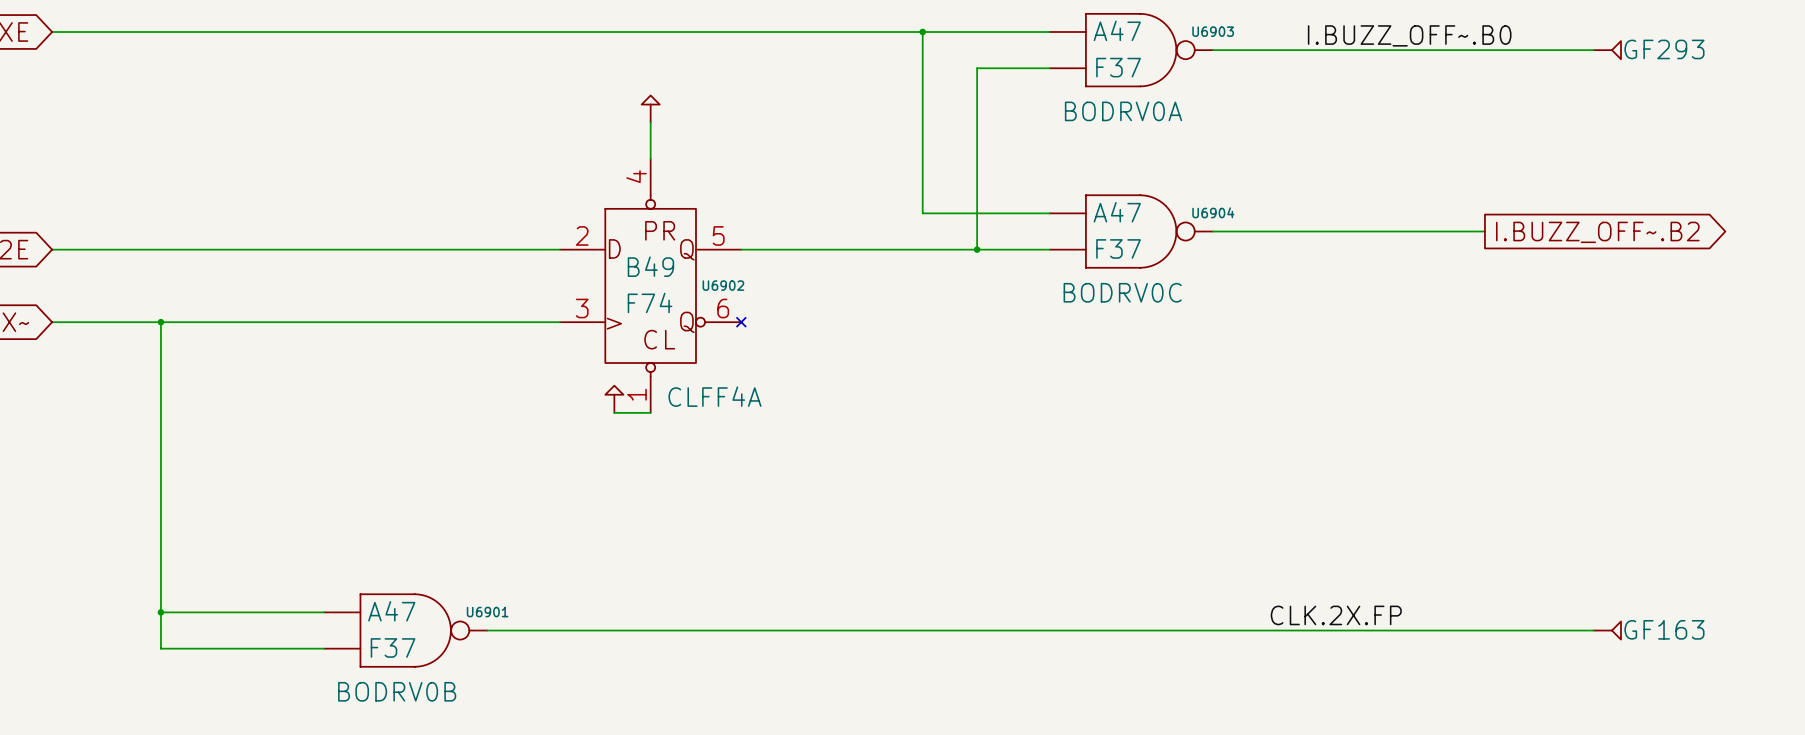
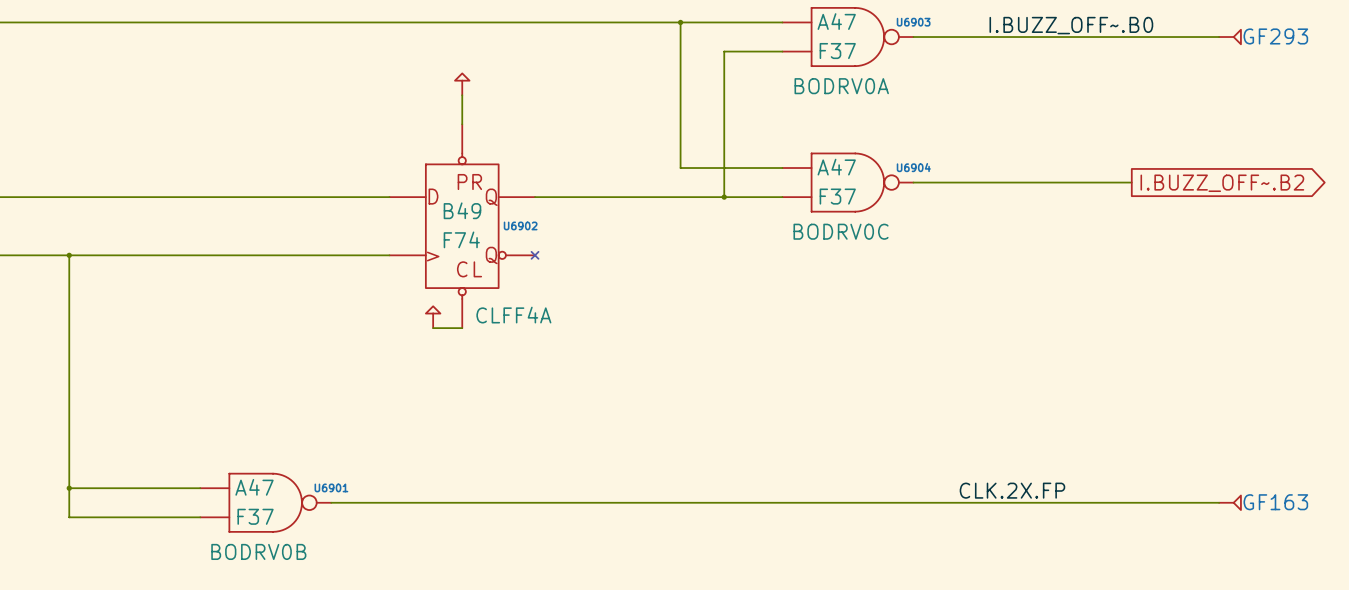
U6902 pin number: 4 (636, 176) -> none
U6902 pin number: 2 (582, 235) -> none
U6902 pin number: 5 (718, 235) -> none
U6902 pin number: 3 (582, 308) -> none
U6902 pin number: 6 (723, 308) -> none
U6902 pin number: 1 (636, 394) -> none

